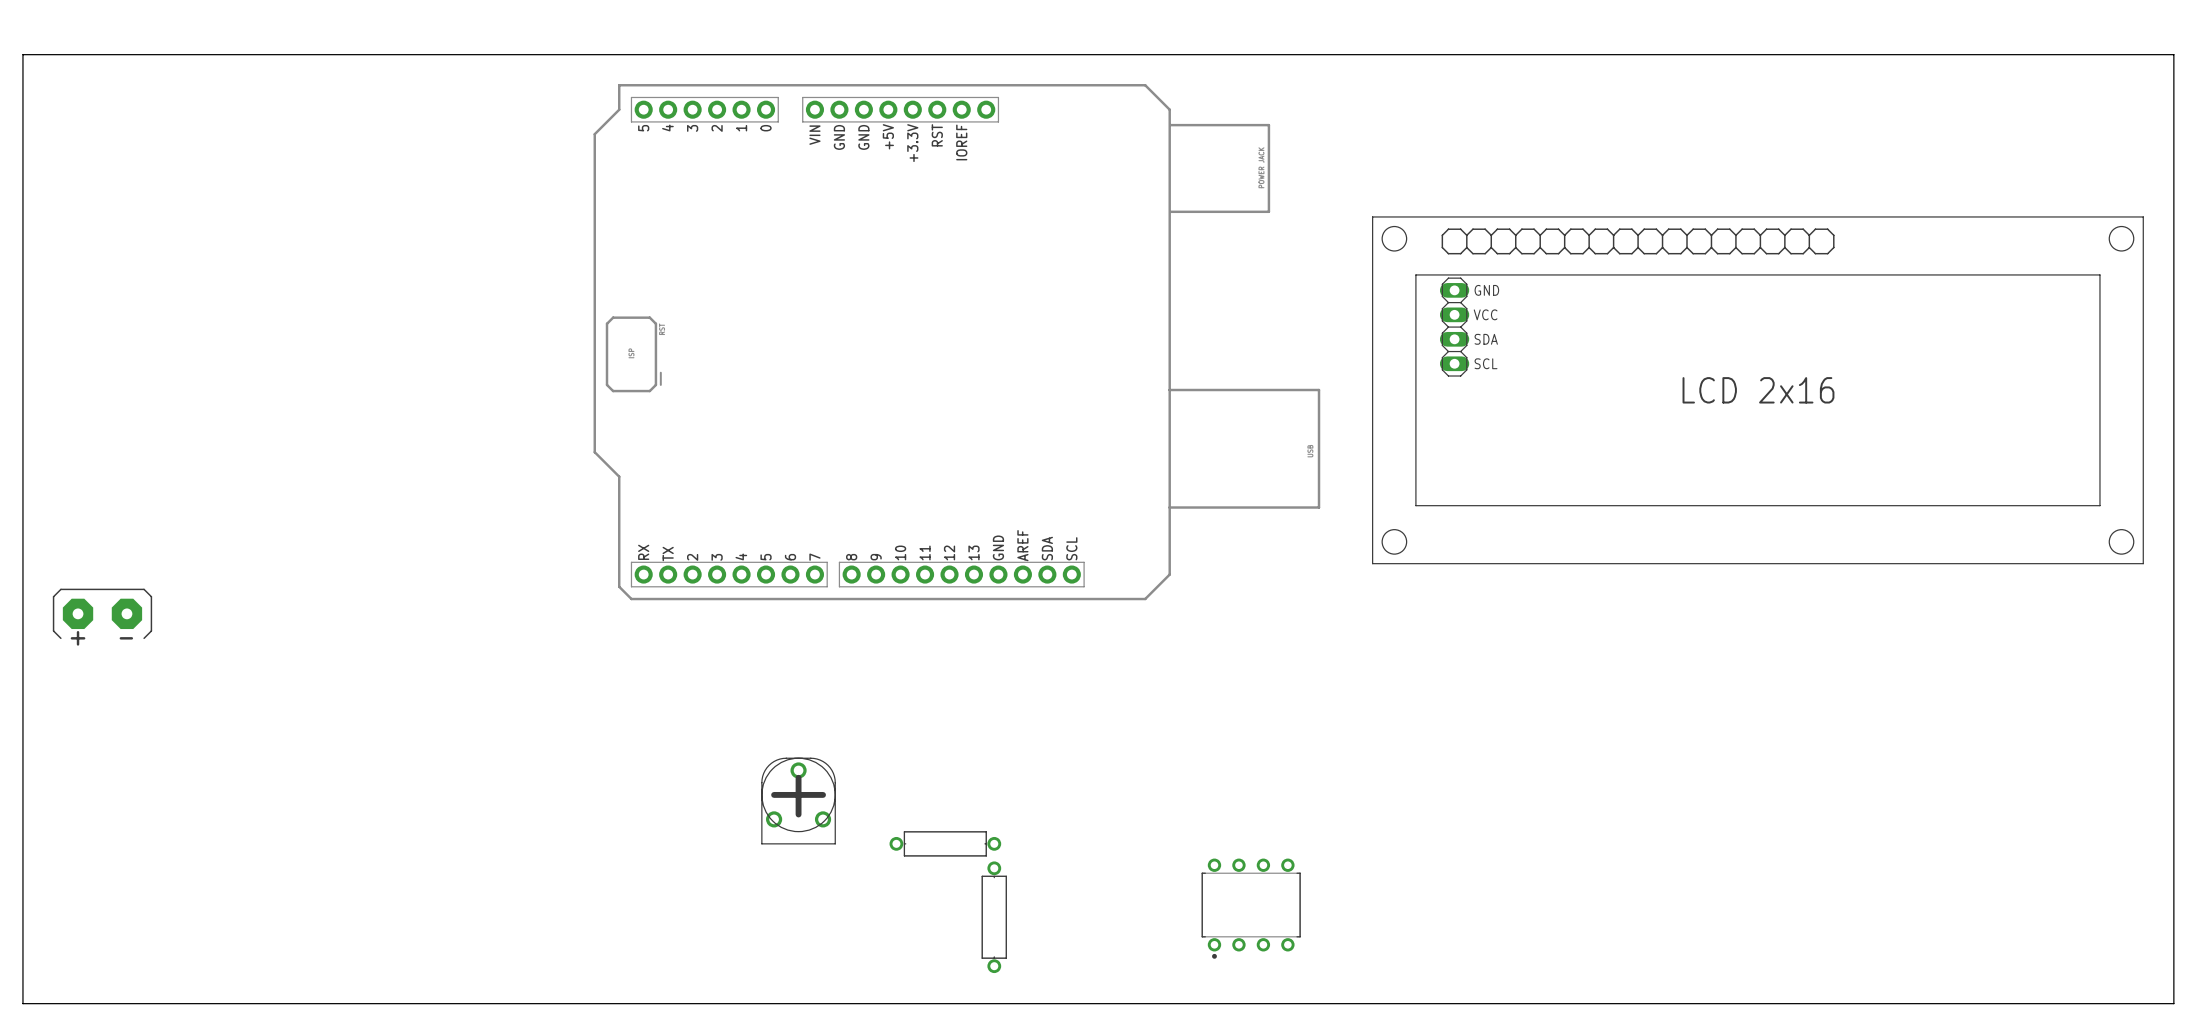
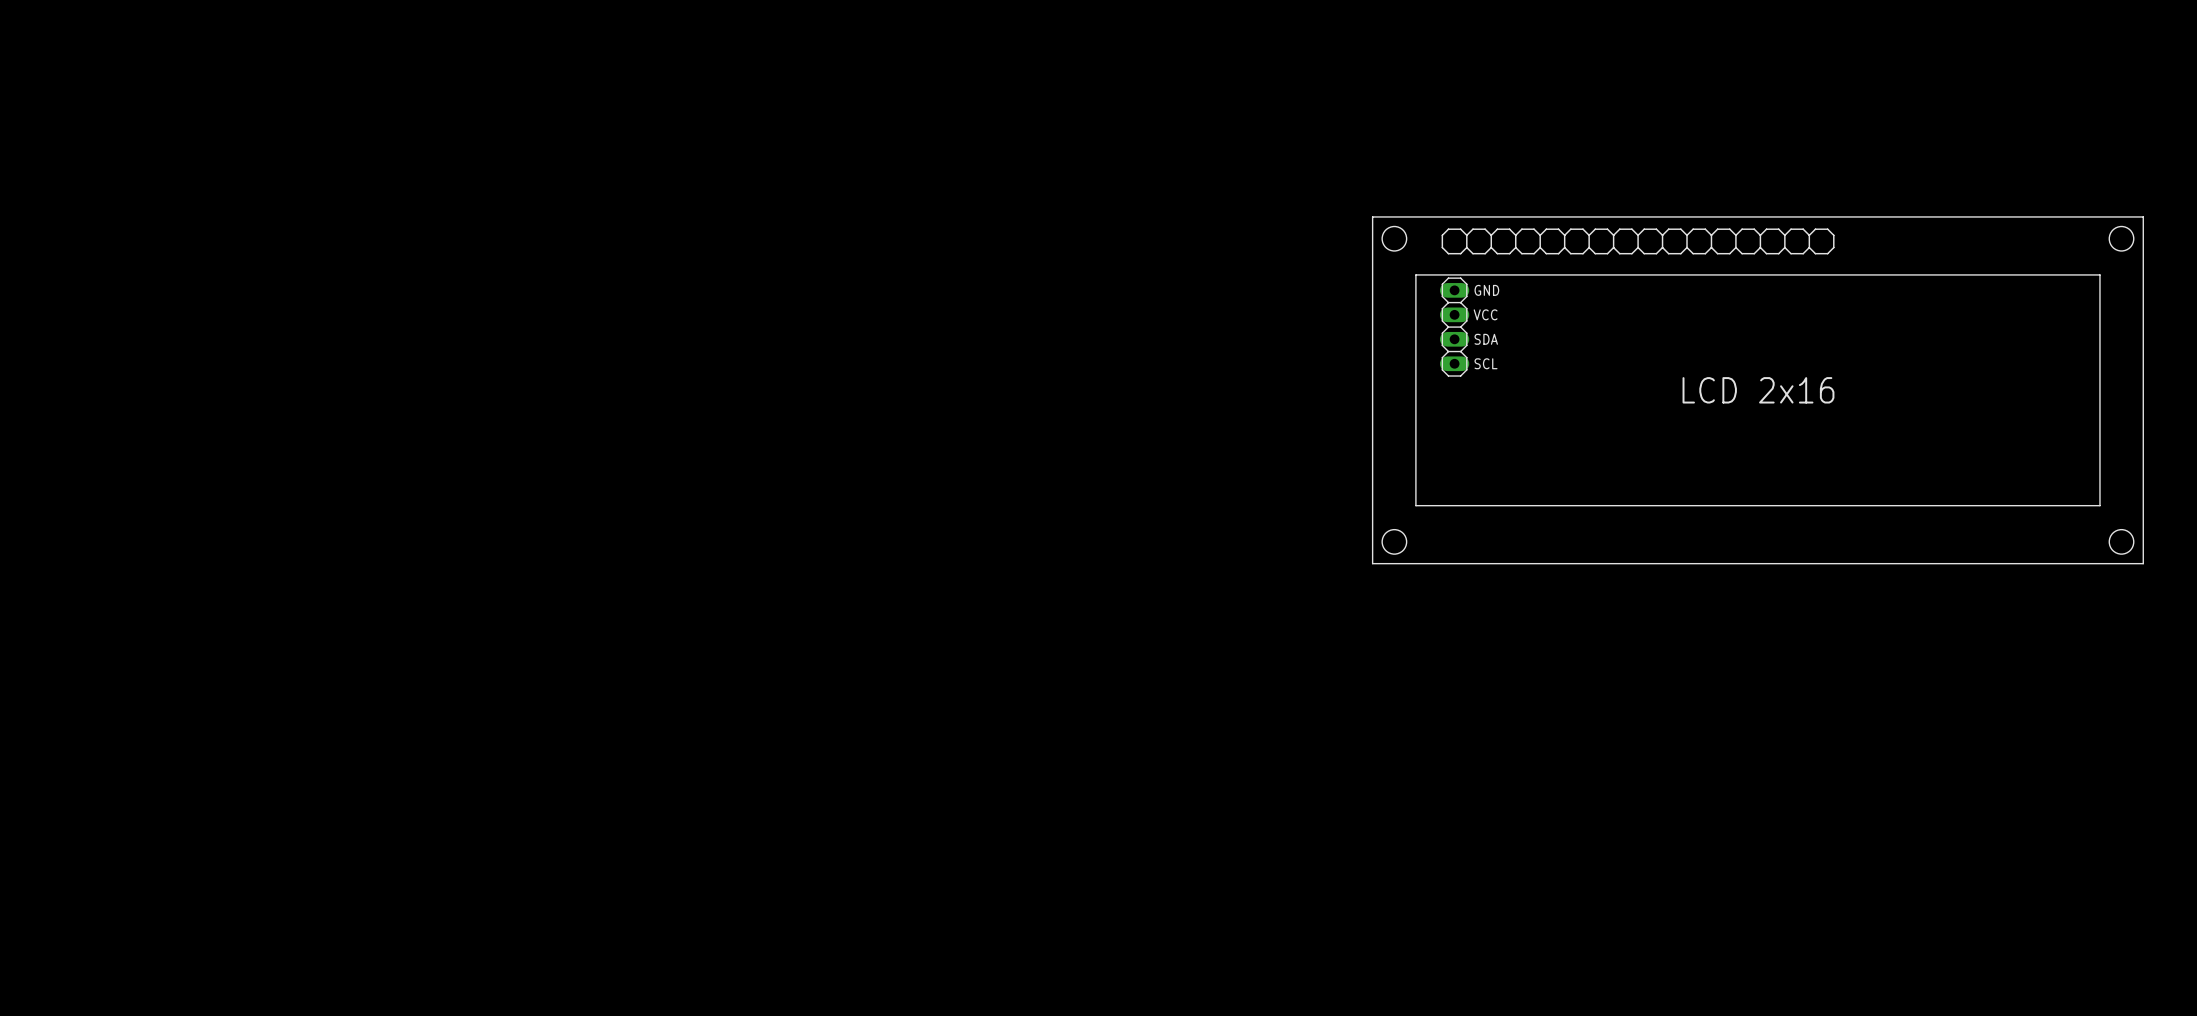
board edge: (22, 54) (2173, 54) (2173, 1003) (22, 1003) (22, 54) -> none
part: (956, 342) -> none
part: (102, 617) -> none
part: (798, 801) -> none
part: (945, 843) -> none
part: (1251, 908) -> none
part: (994, 917) -> none

